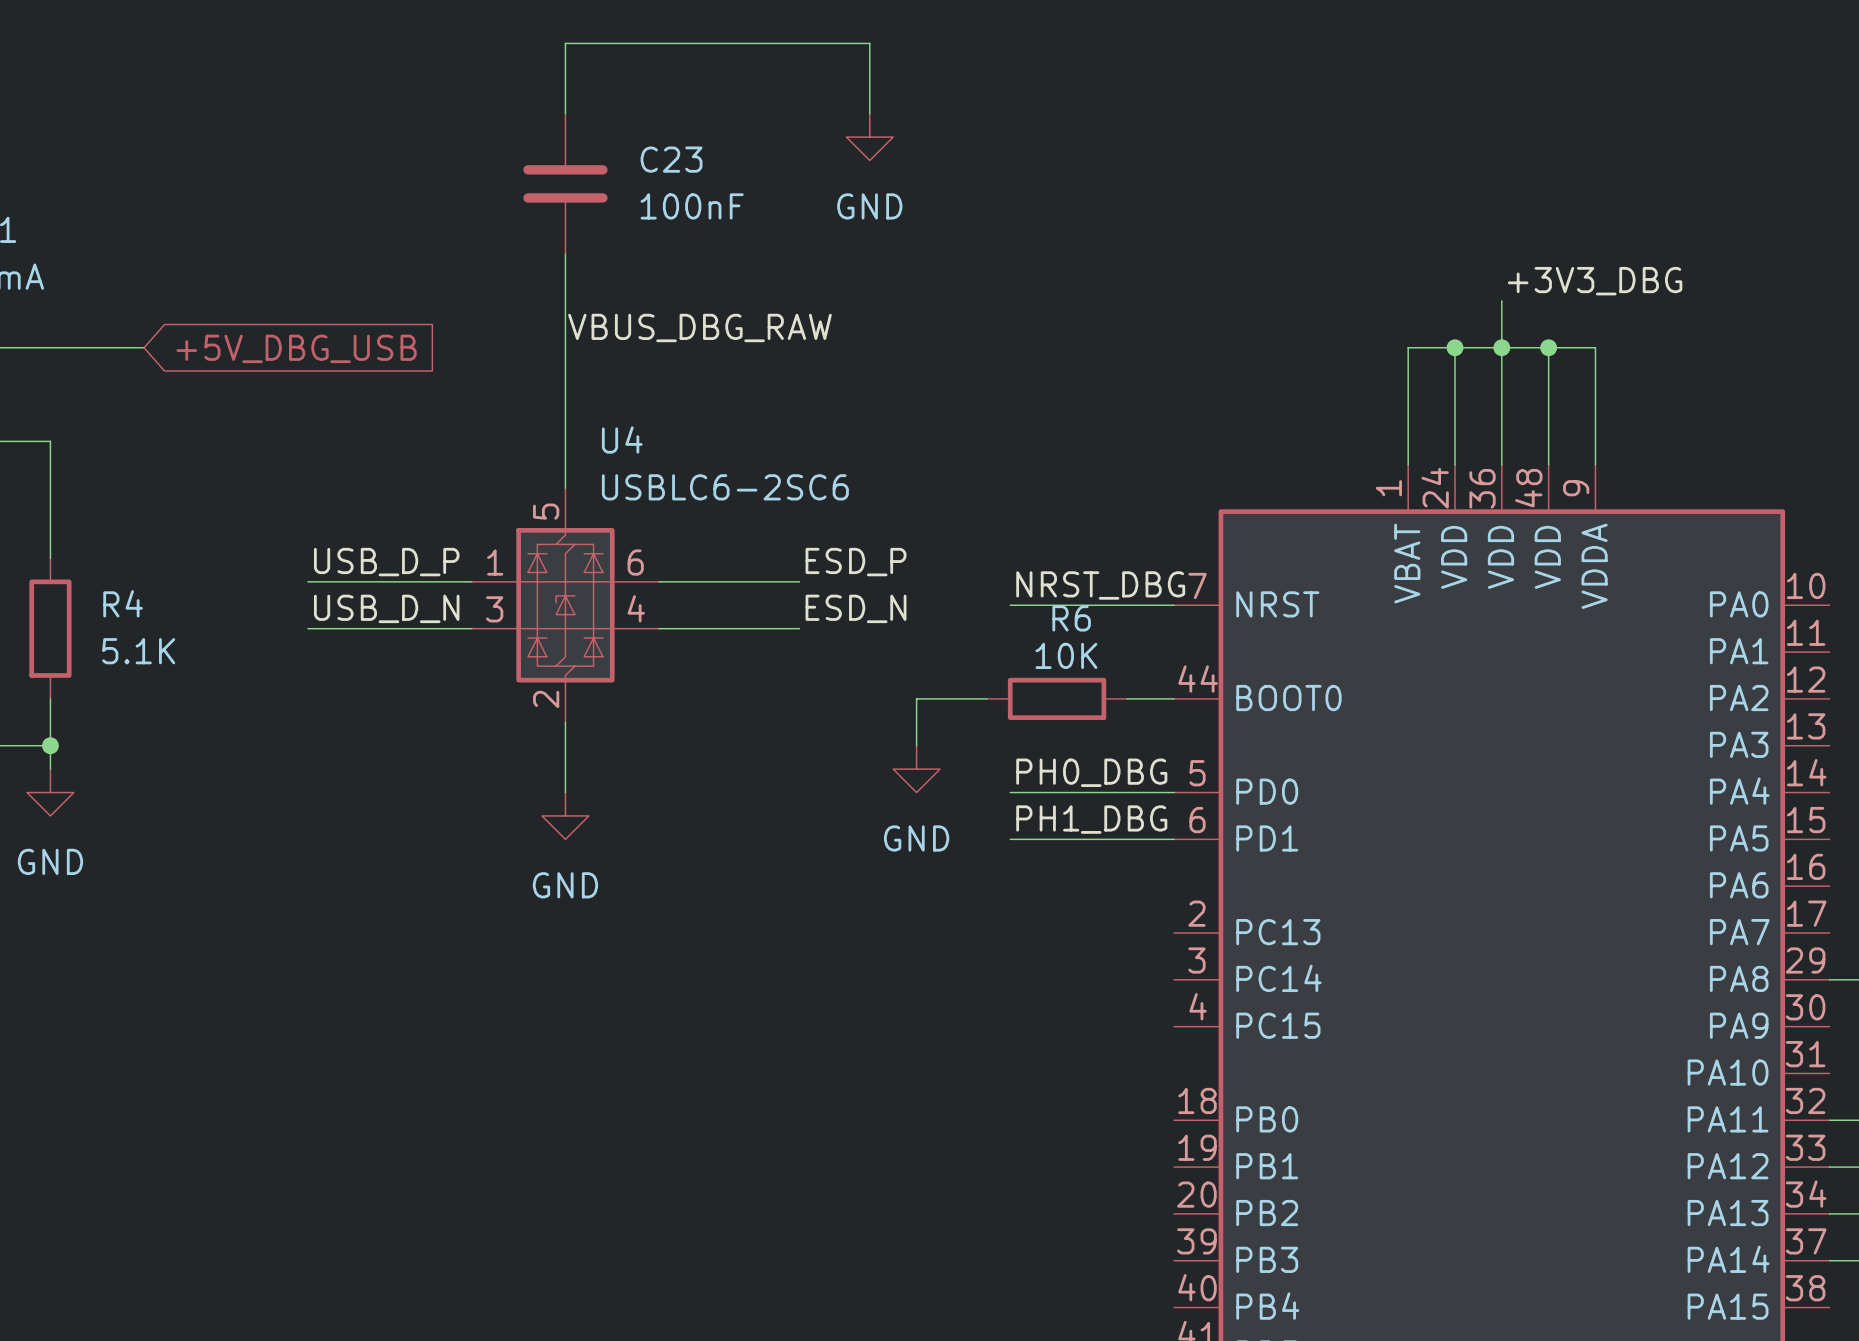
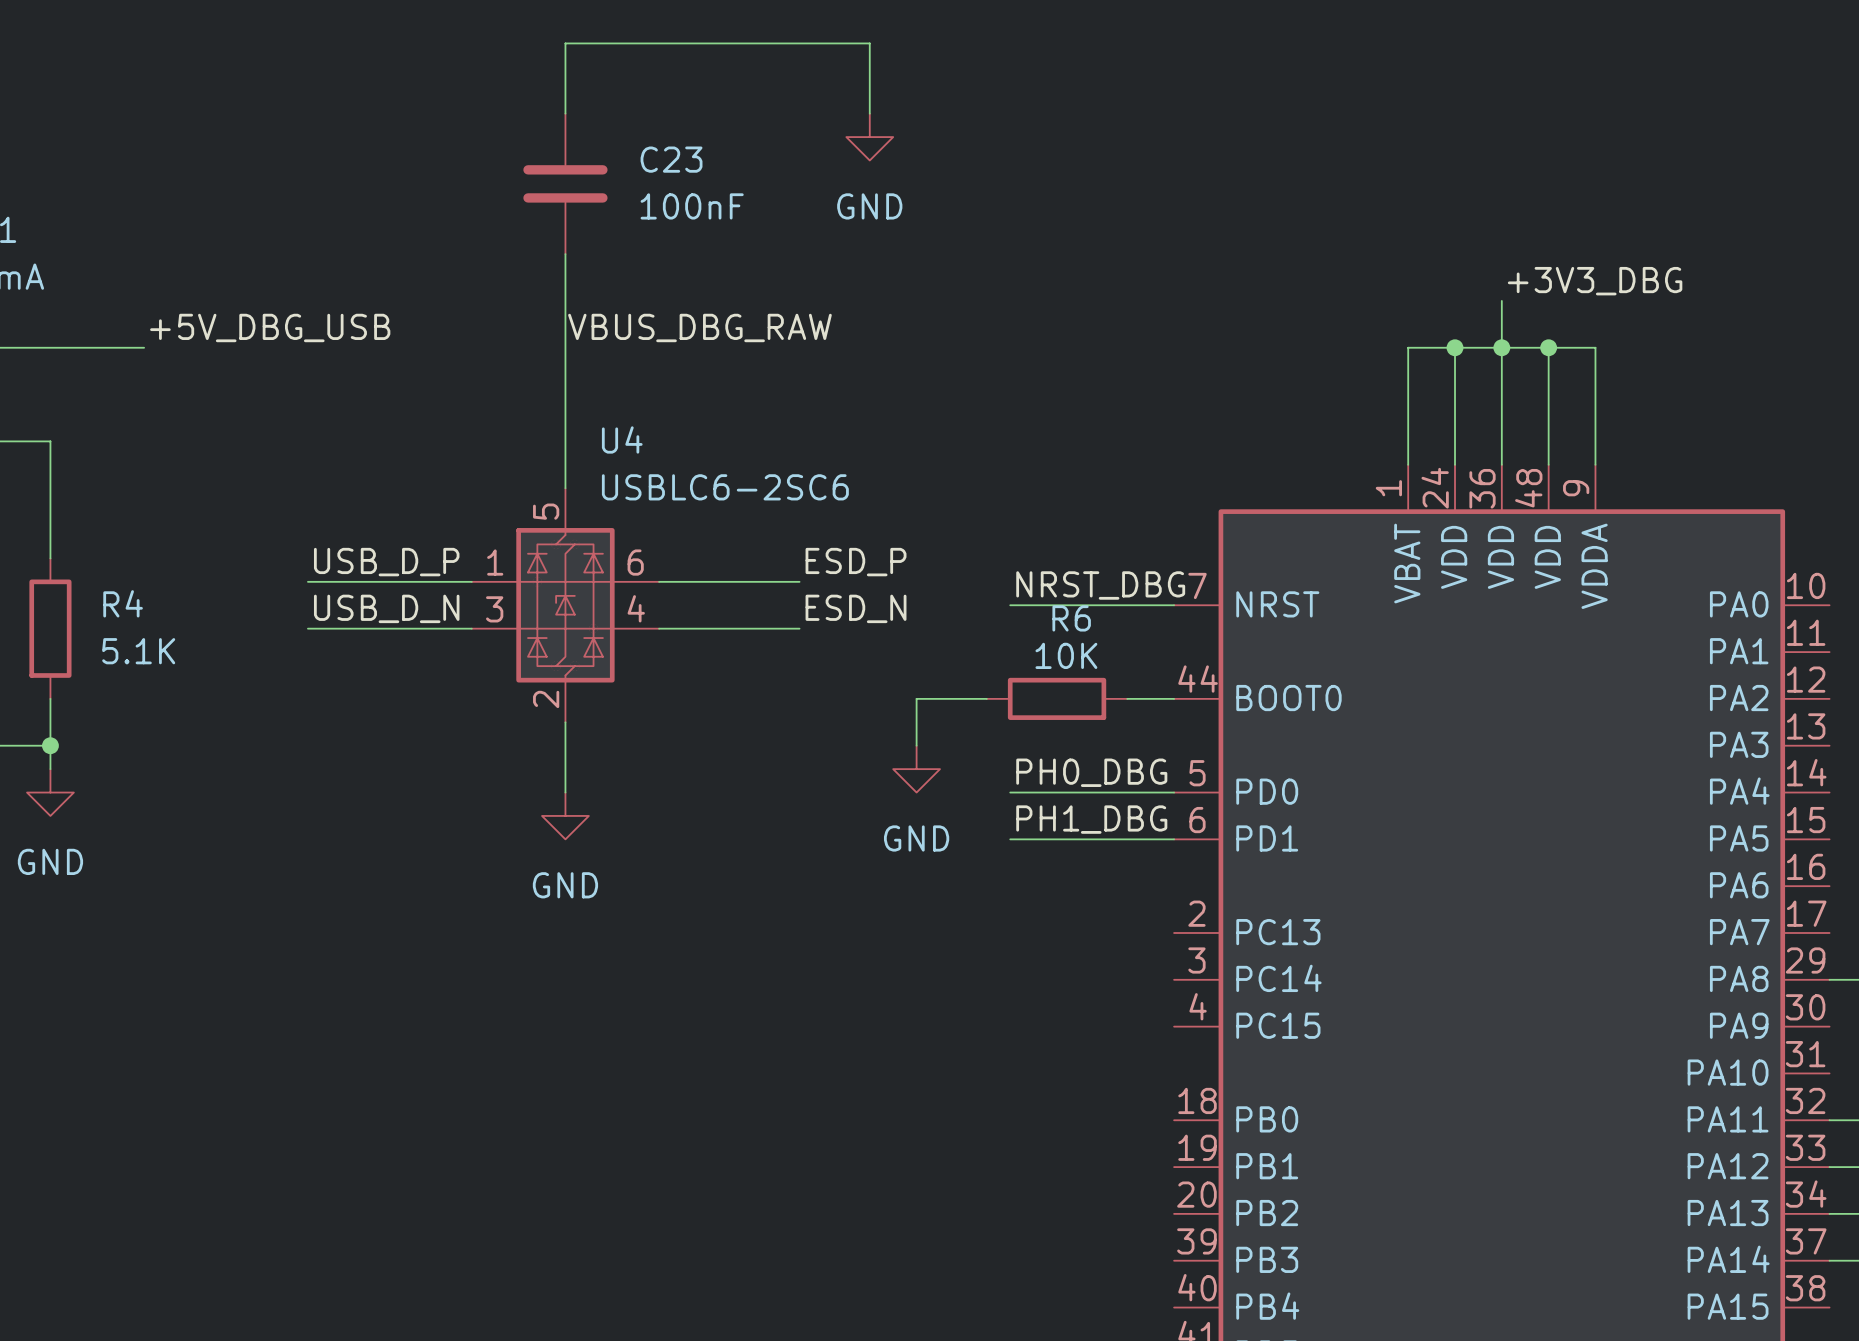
label: none -> +5V_DBG_USB (270, 327)
global label: +5V_DBG_USB (296, 348) -> none

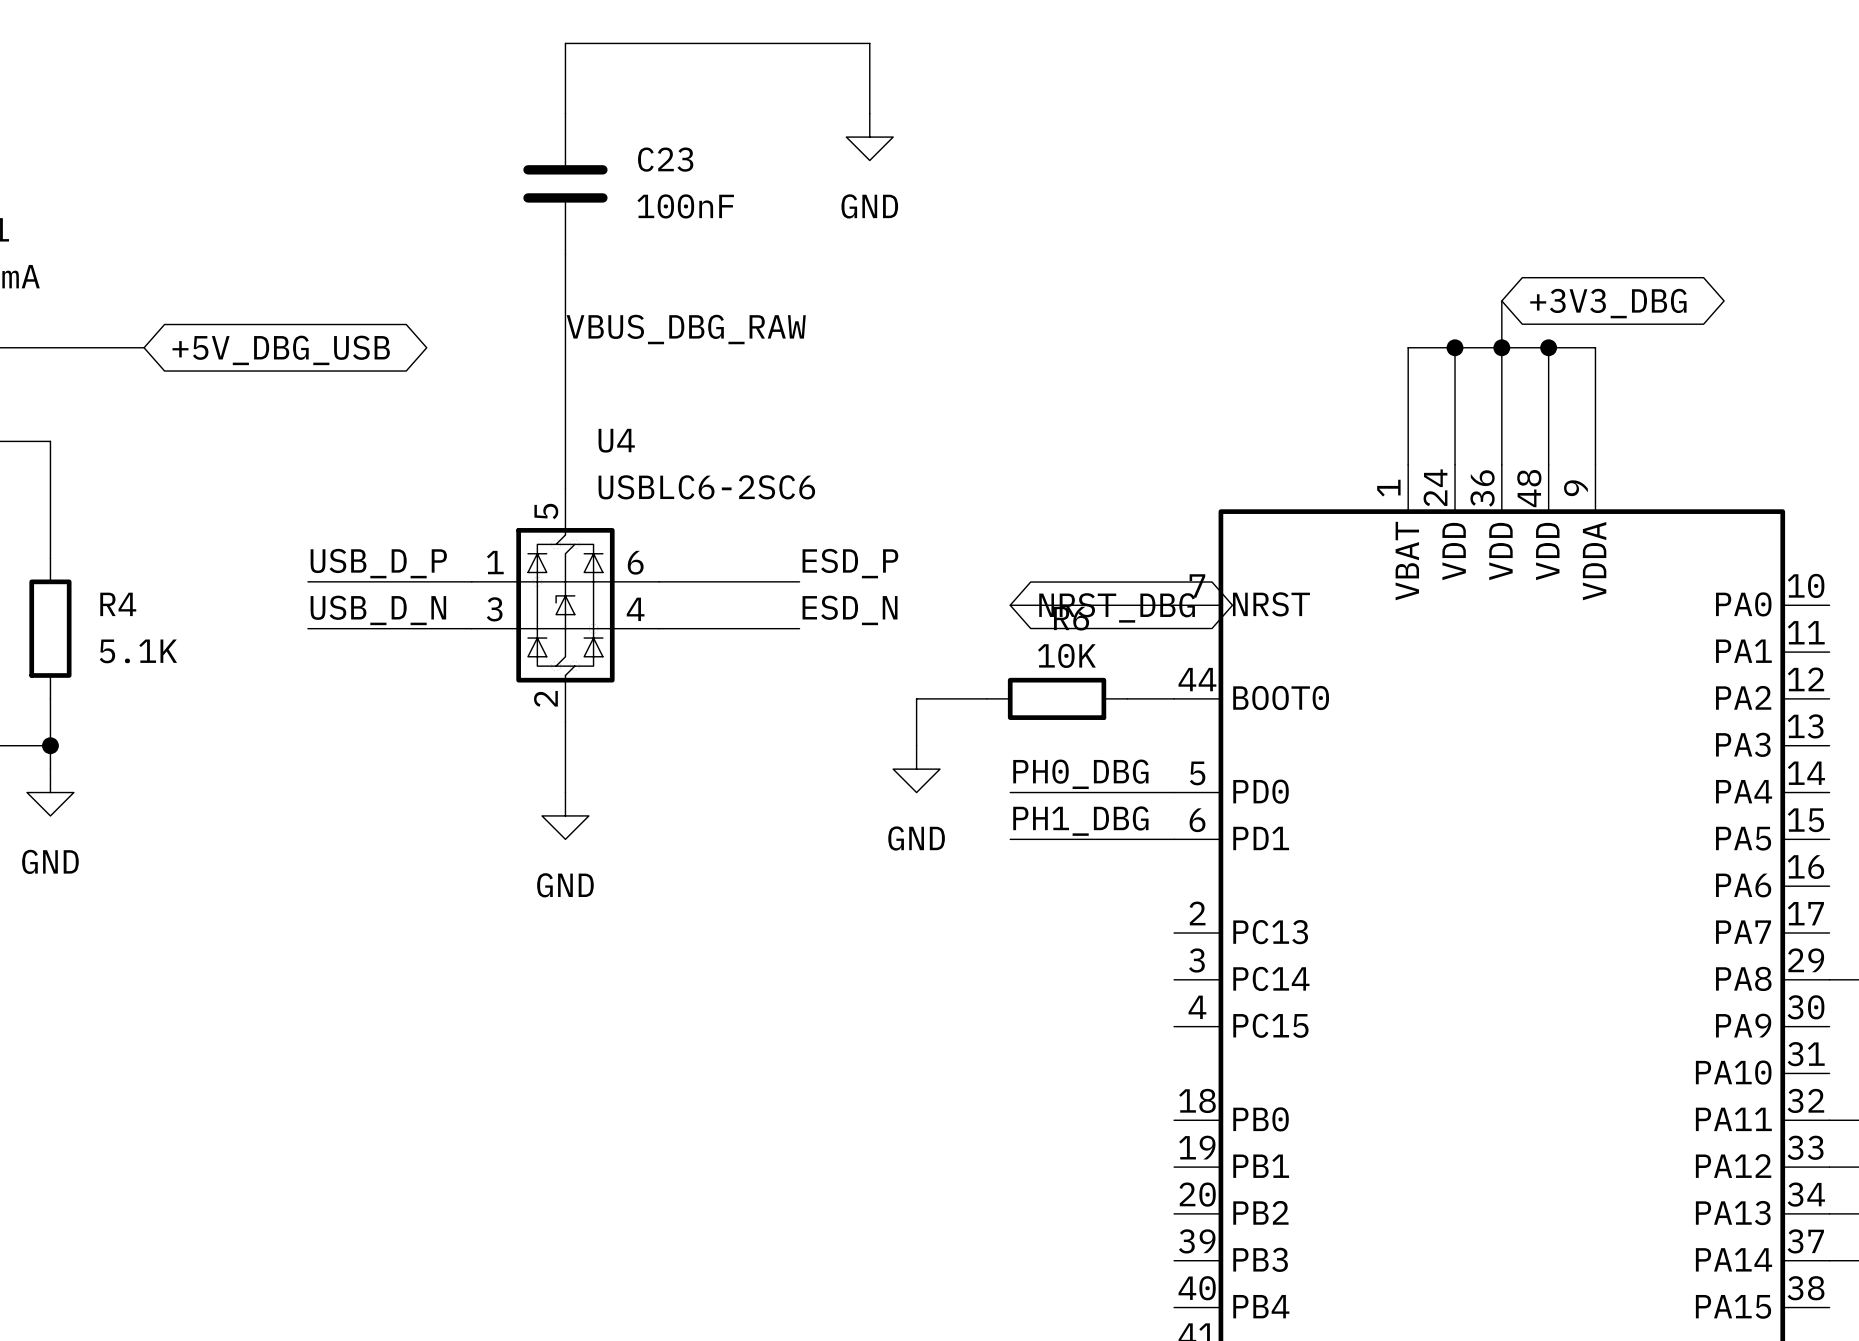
label: +3V3_DBG (1595, 281) -> none
global label: none -> +3V3_DBG (1608, 303)
label: +5V_DBG_USB (270, 327) -> none
global label: none -> +5V_DBG_USB (281, 350)
label: NRST_DBG (1100, 585) -> none
global label: none -> NRST_DBG (1117, 607)

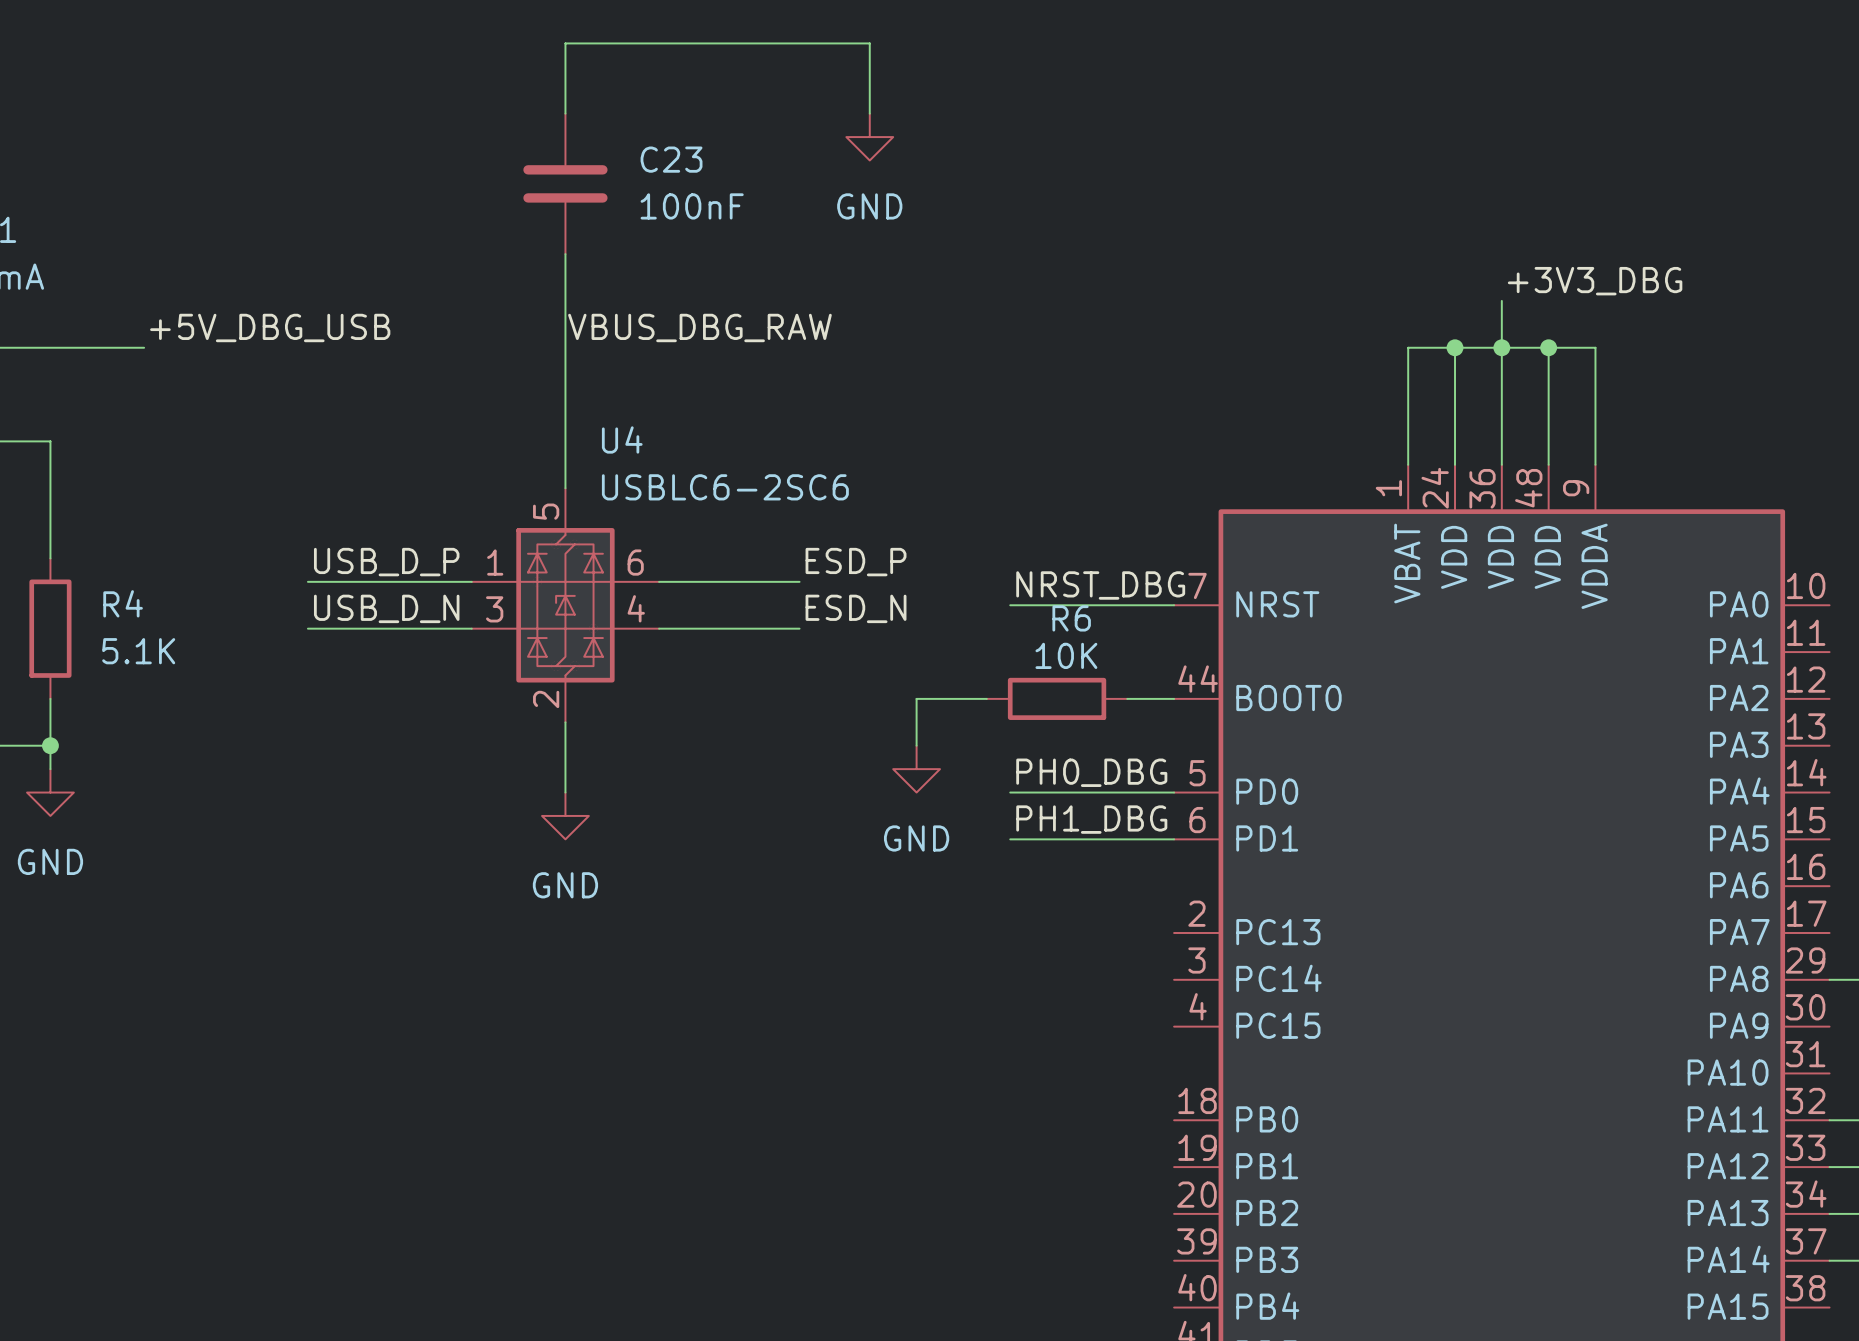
label: none -> +3V3_DBG (1595, 281)
global label: +3V3_DBG (1608, 303) -> none
label: none -> +5V_DBG_USB (270, 327)
global label: +5V_DBG_USB (281, 350) -> none
label: none -> NRST_DBG (1100, 585)
global label: NRST_DBG (1117, 607) -> none

